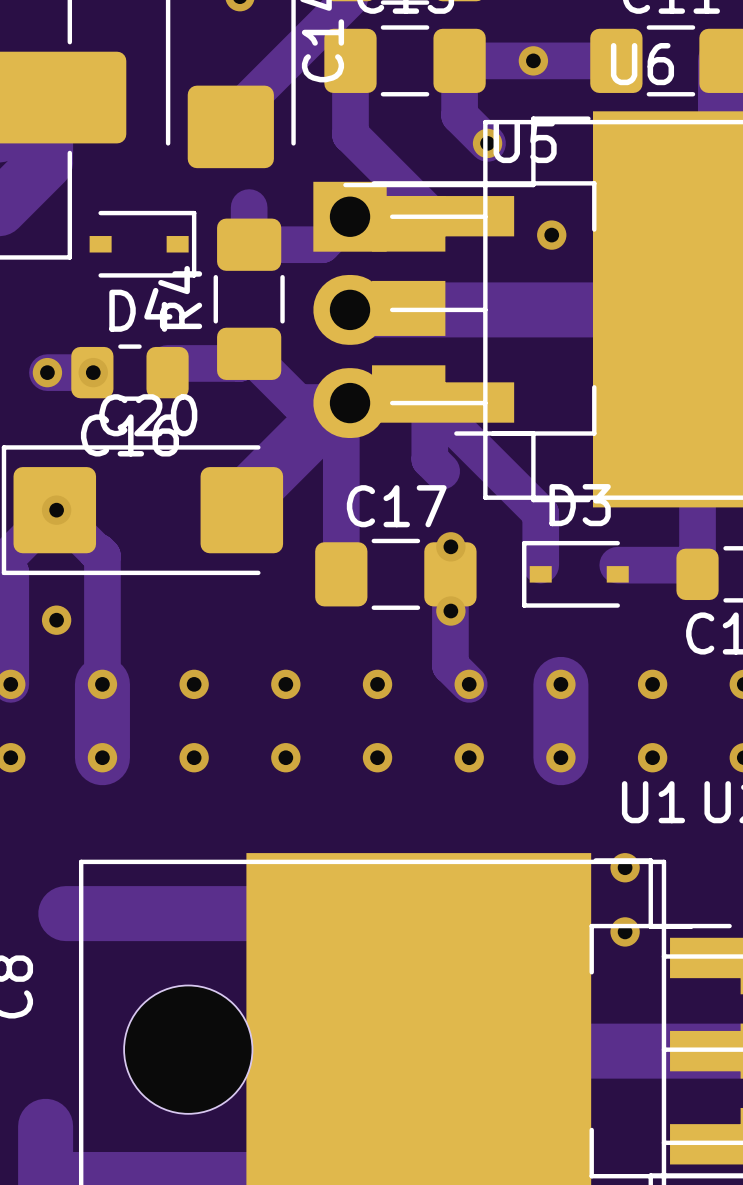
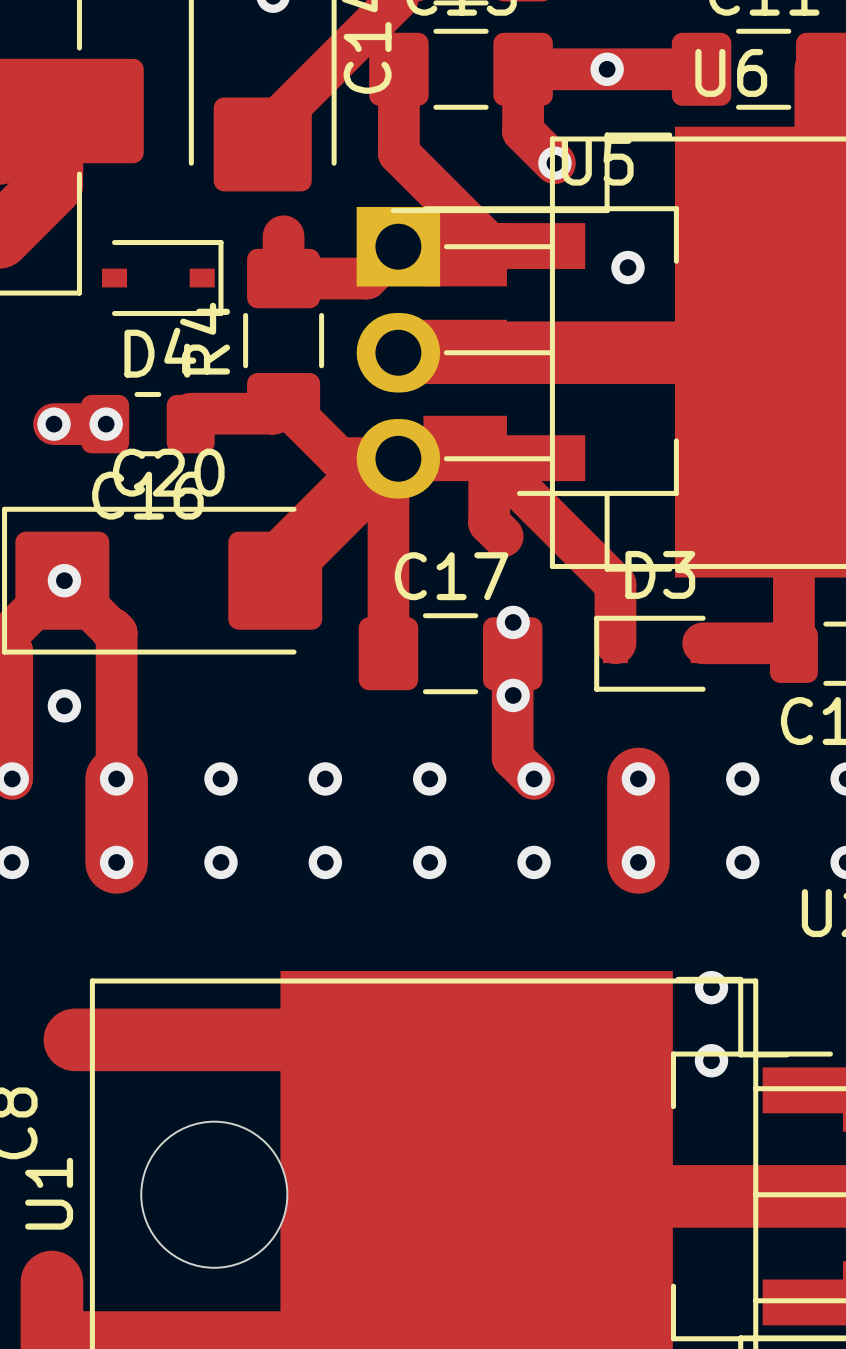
U1 name rotation: 0° (653, 802) -> 90° counterclockwise (49, 1193)
U1 name position: U1 (653, 802) -> U1 (49, 1193)

